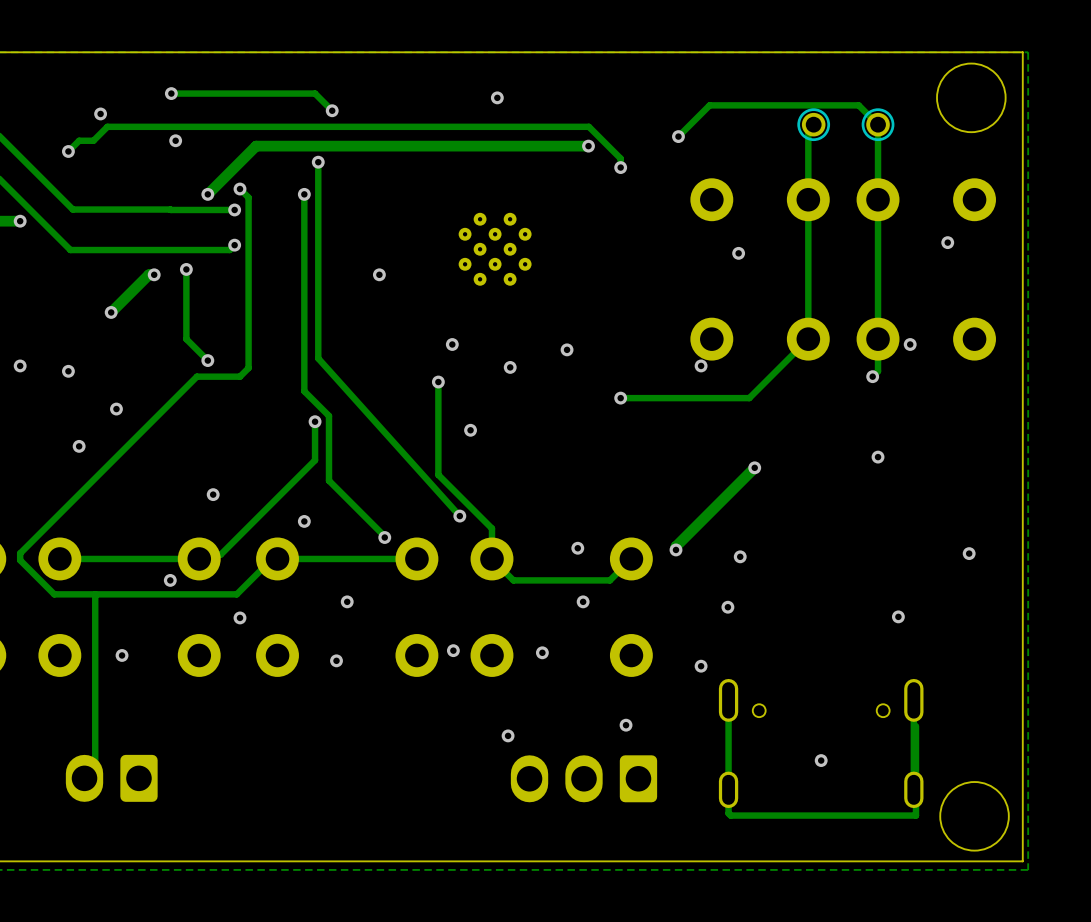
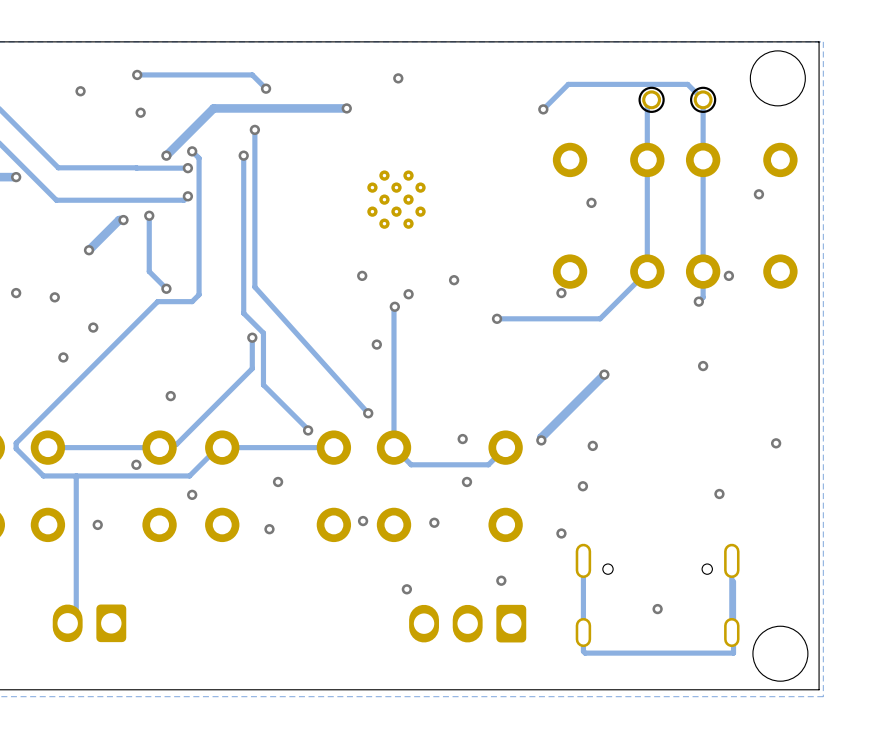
via: none -> (346, 108)
track: (588, 146) (256, 146) -> (346, 108) (213, 108) (205, 117)
via: (588, 146) -> none
track: (68, 151) (79, 140) (93, 140) (107, 126) (588, 126) (620, 158) (620, 167) -> none
via: (68, 151) -> none
via: (620, 167) -> none
via: (379, 274) -> none
track: (438, 382) (438, 474) (491, 528) -> (394, 306) (393, 423)
via position: (438, 382) -> (394, 306)
via: (304, 521) -> none

